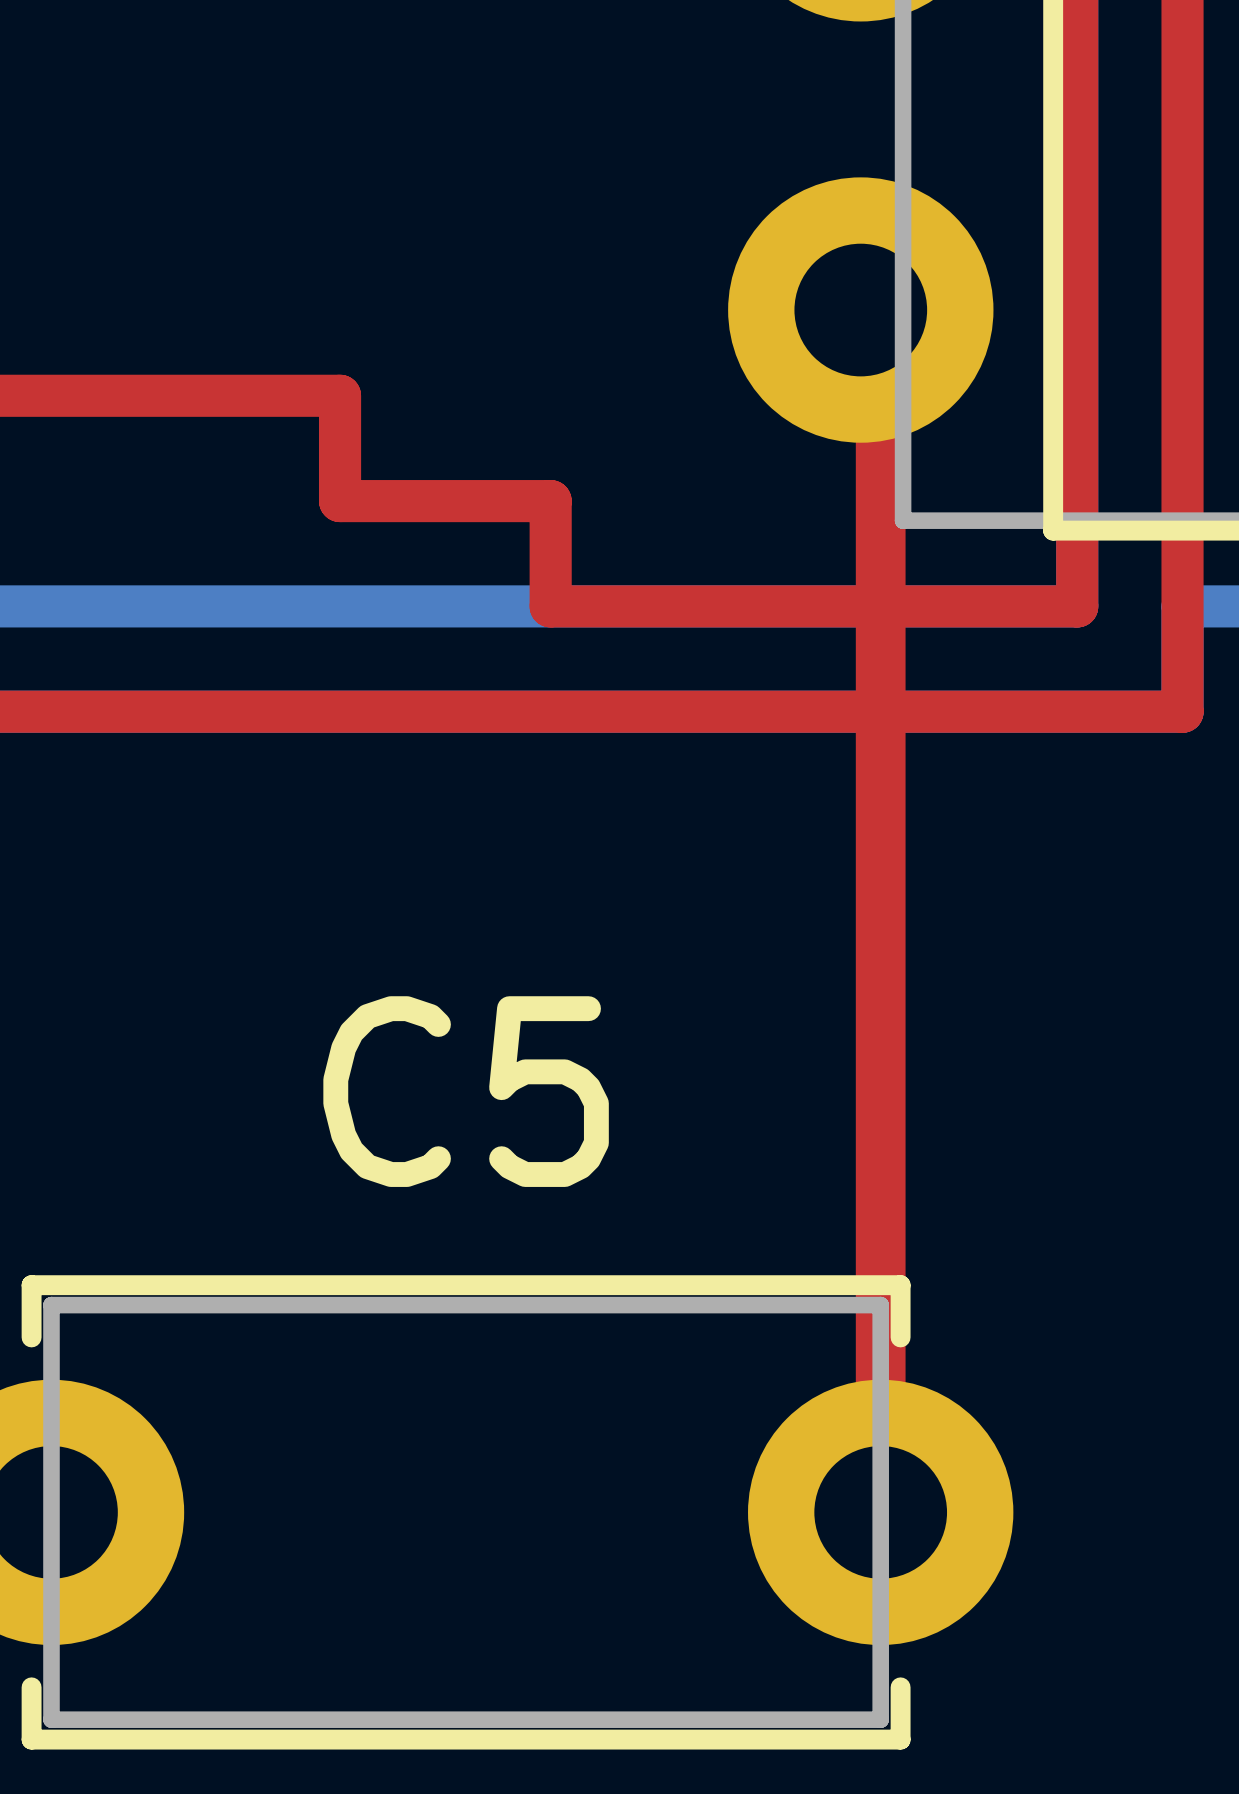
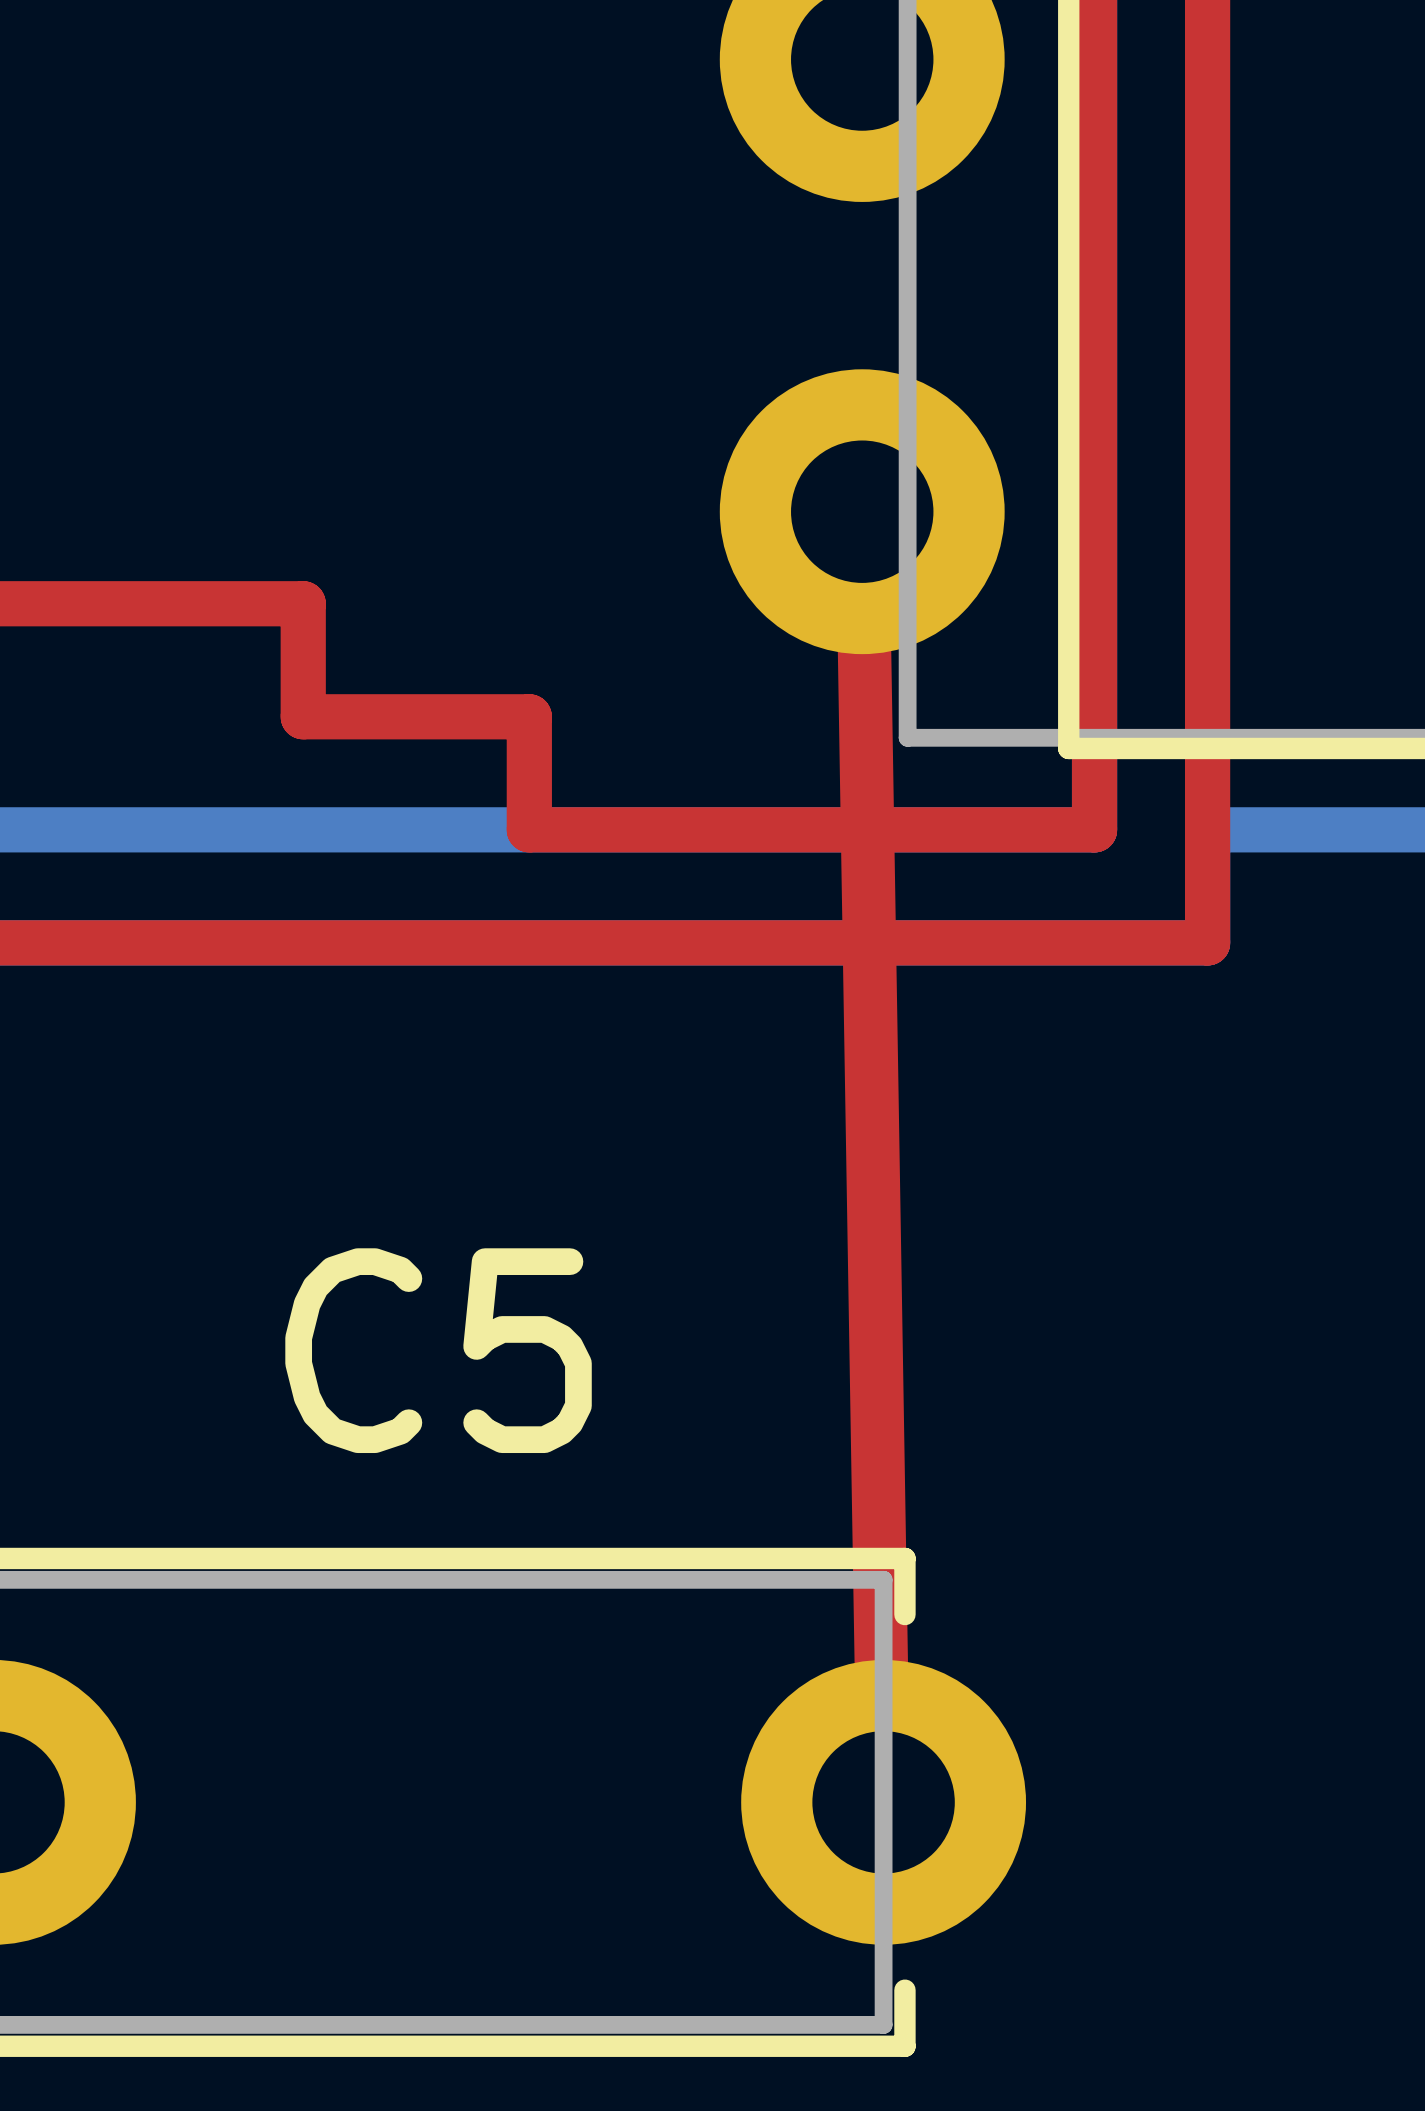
top track: (880, 310) (880, 1512) -> (862, 511) (883, 1802)

